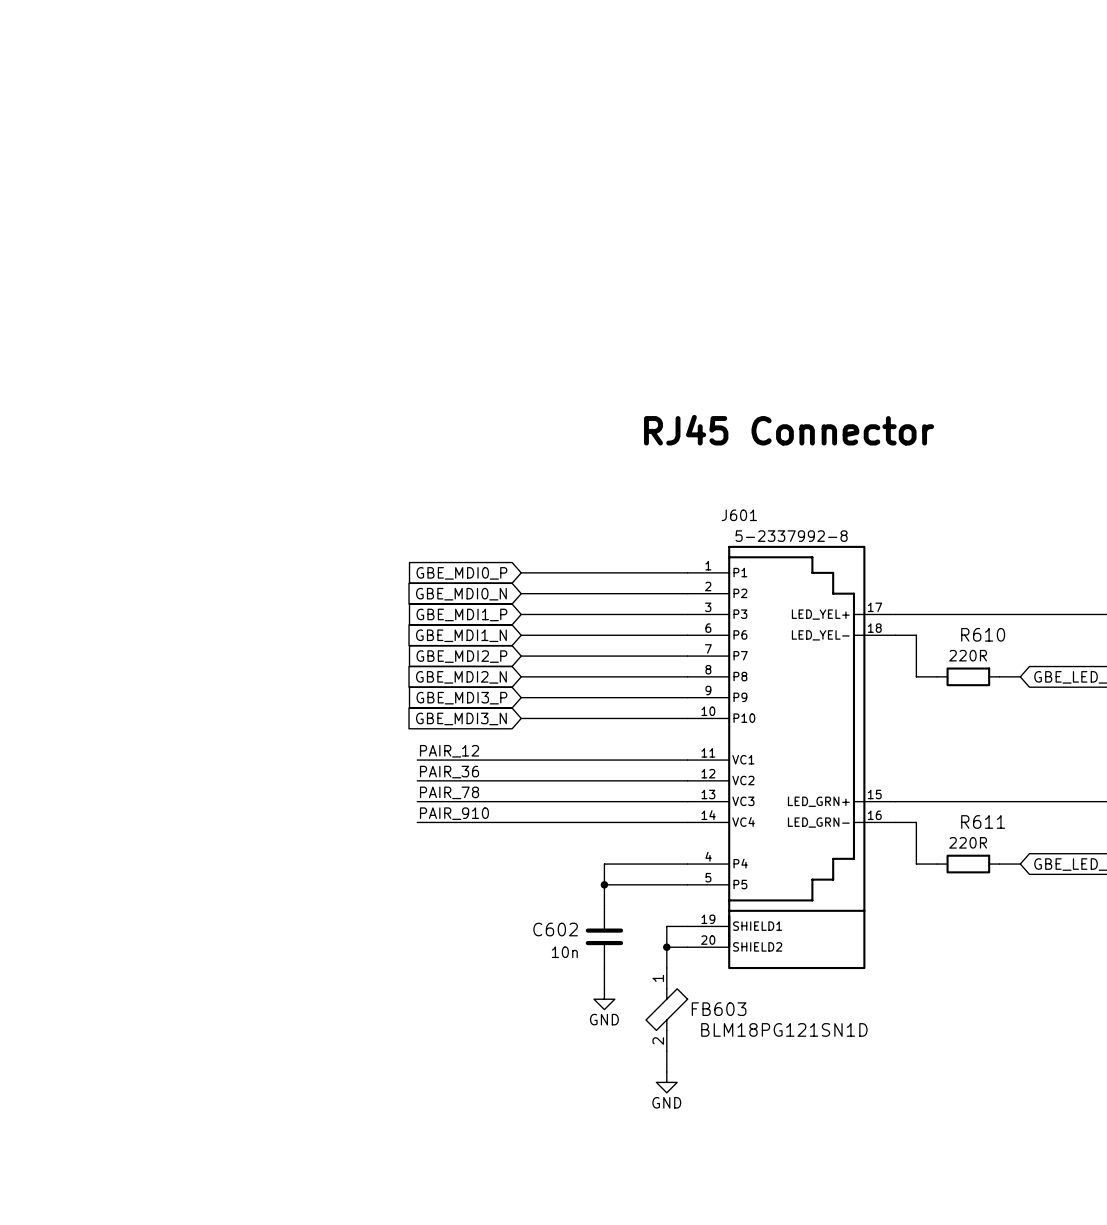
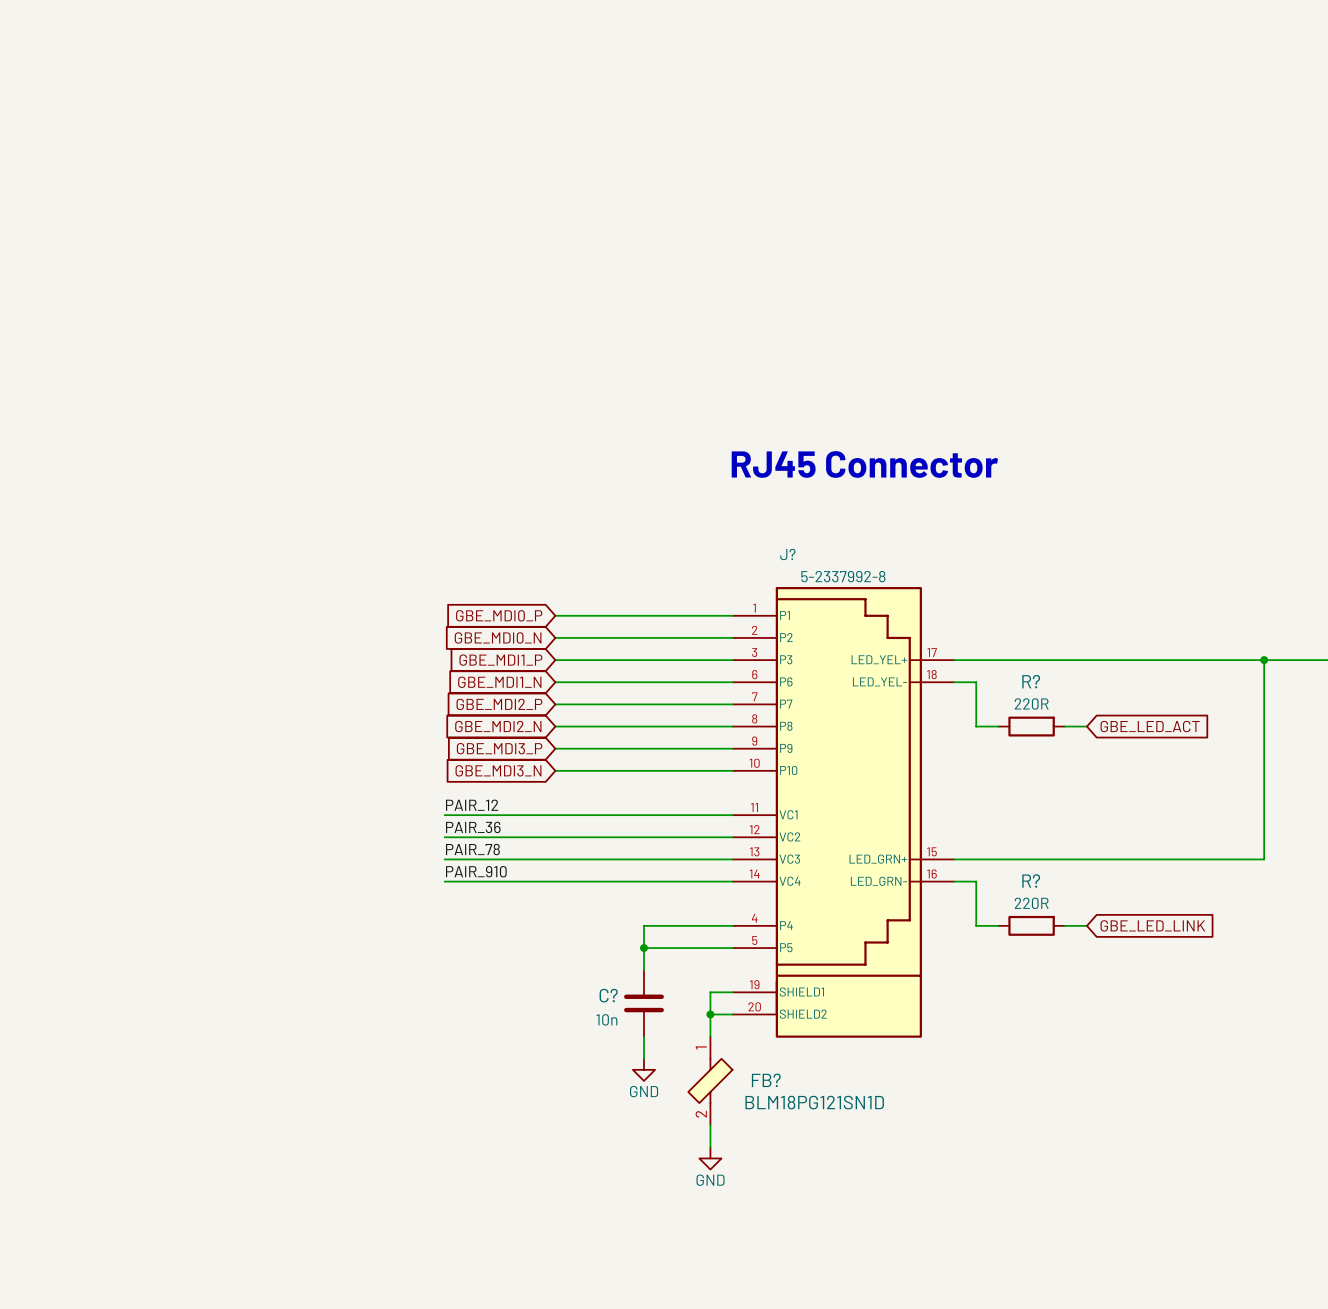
J601 name: J601 (739, 515) -> J? (787, 554)
R610 name: R610 (983, 634) -> R? (1031, 681)
R611 name: R611 (983, 821) -> R? (1031, 881)
C602 name: C602 (555, 929) -> C? (608, 995)
FB603 name: FB603 (719, 1009) -> FB? (766, 1080)

